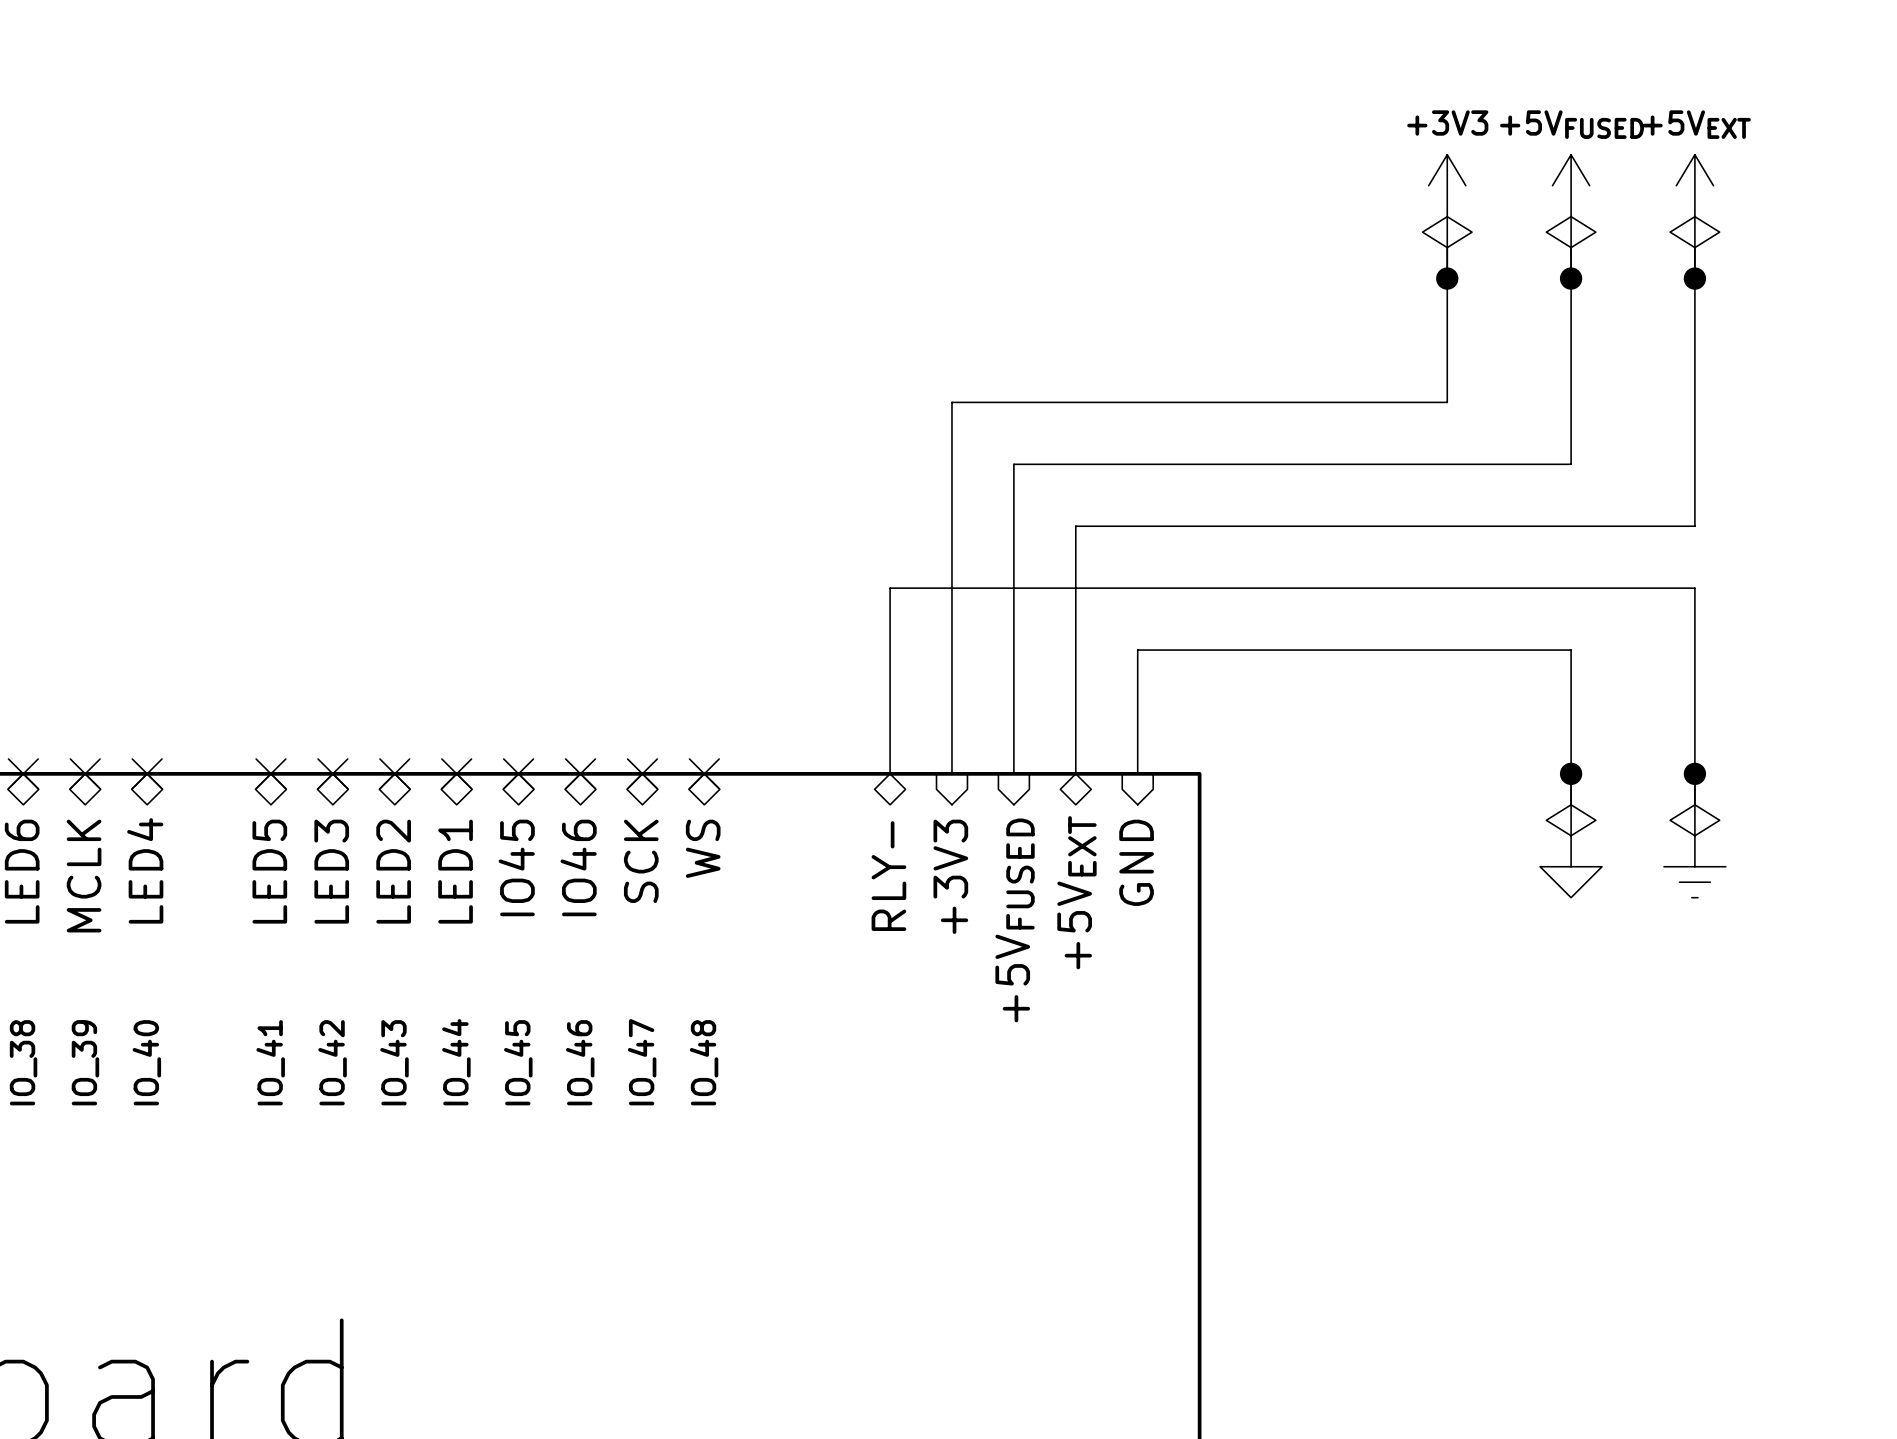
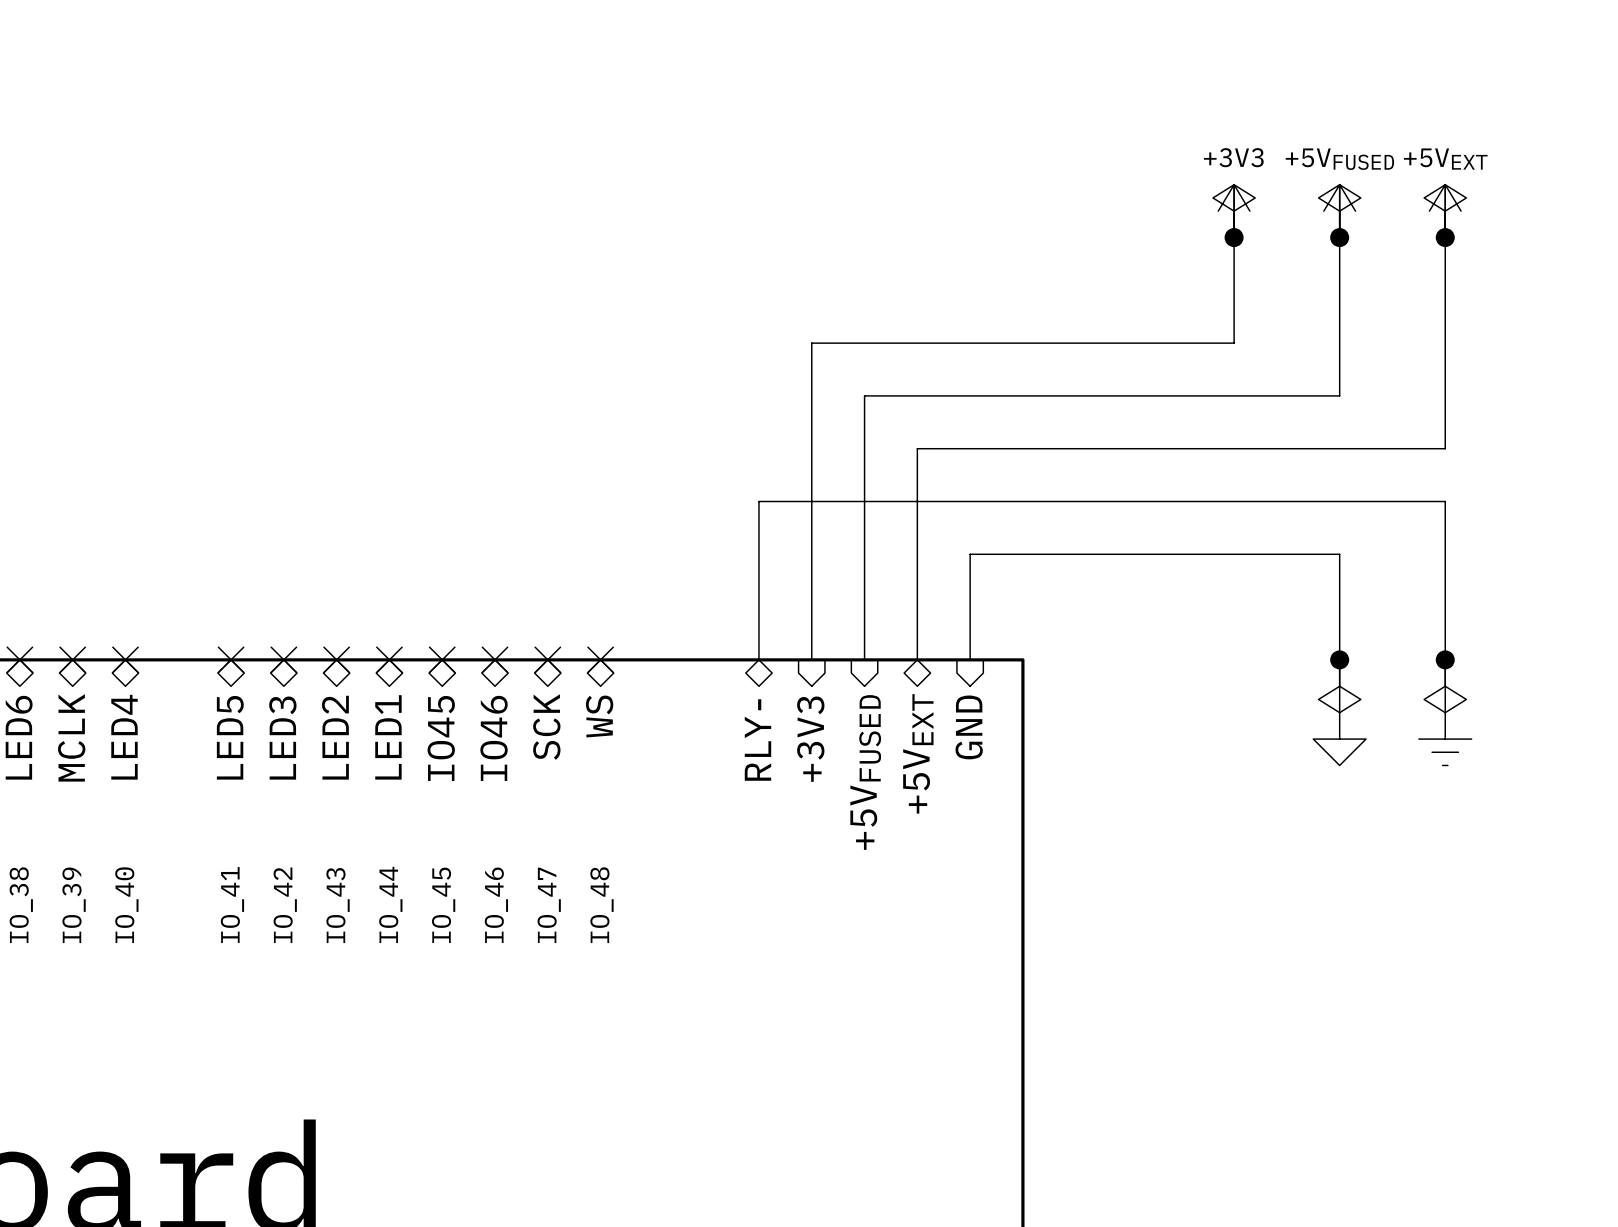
power symbol position: +3V3 (1447, 185) -> +3V3 (1234, 211)
power symbol position: +5VFUSED (1571, 185) -> +5VFUSED (1339, 211)
power symbol position: +5VEXT (1694, 185) -> +5VEXT (1445, 211)

